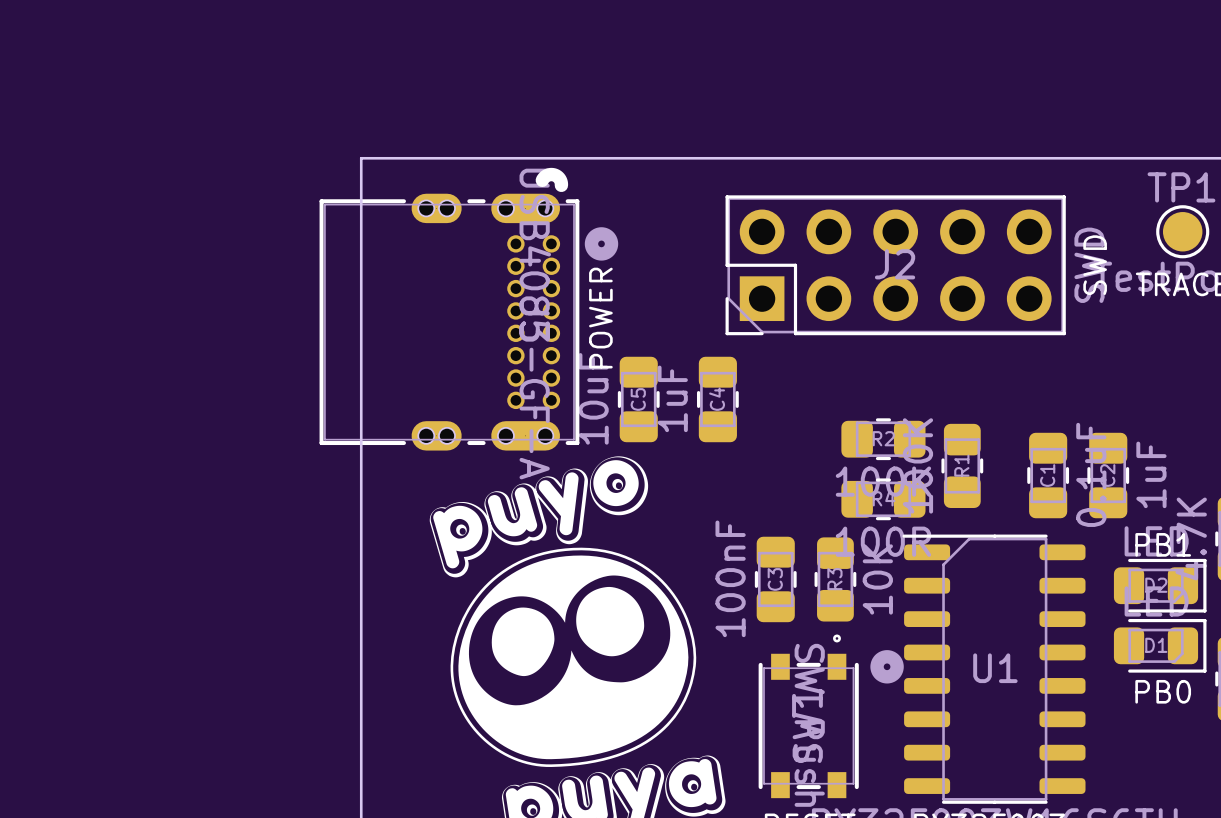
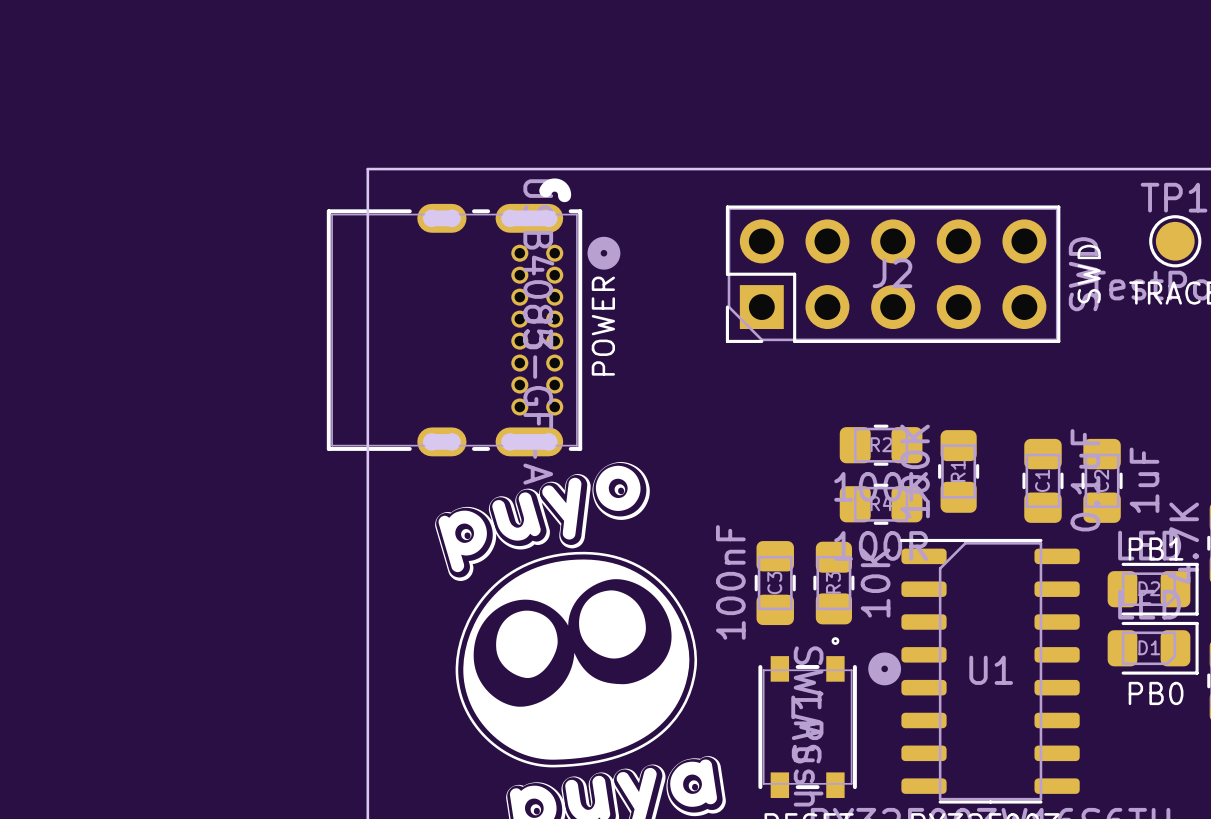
part footprint: [319, 167, 619, 451] -> [326, 178, 621, 457]
C5: 10uF (638, 399) -> none
C4: 1uF (717, 399) -> none

